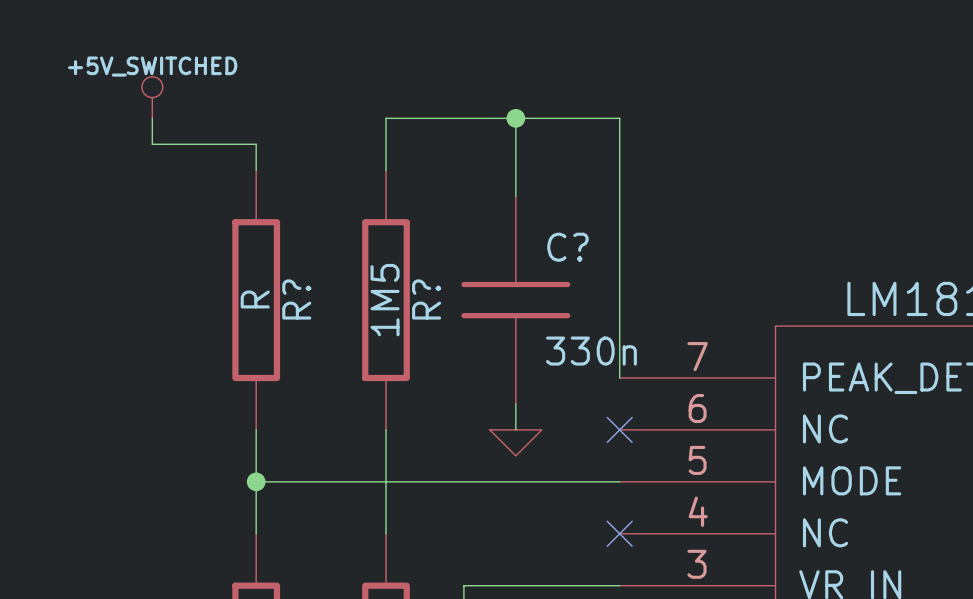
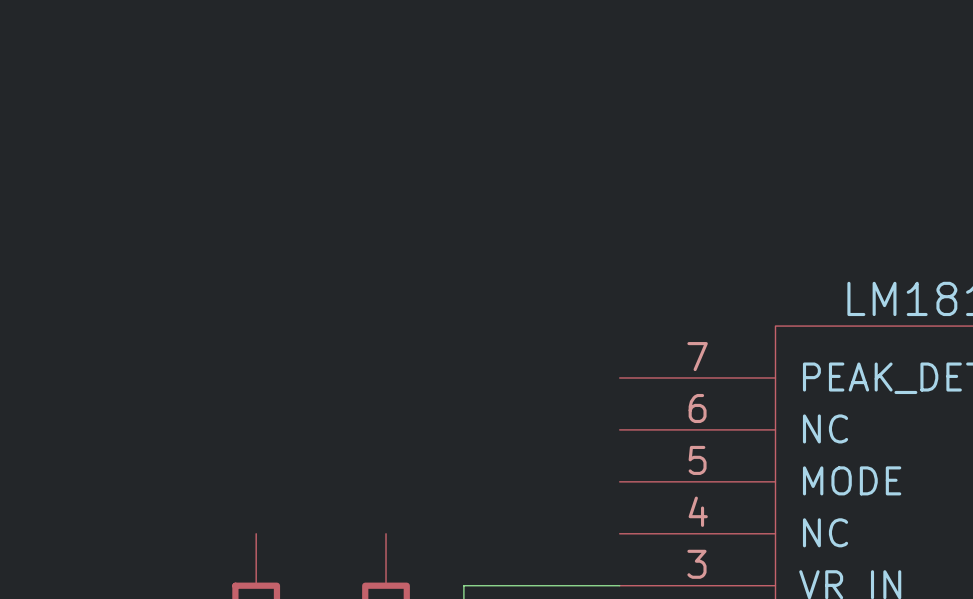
power symbol: +5V_SWITCHED (152, 97) -> none
wire: (152, 118) (152, 144) (256, 144) (256, 170) -> none
wire: (515, 118) (515, 196) -> none
junction: (515, 118) -> none
wire: (386, 170) (386, 118) (619, 118) (619, 377) -> none
R?: R (256, 300) -> none
R?: 1M5 (386, 300) -> none
C?: 330n (515, 300) -> none
wire: (515, 403) (515, 429) -> none
wire: (256, 429) (256, 533) -> none
wire: (386, 429) (386, 533) -> none
no-connect mark: (619, 429) -> none
power symbol: (515, 442) -> none
wire: (256, 481) (619, 481) -> none
junction: (256, 481) -> none
no-connect mark: (619, 533) -> none

